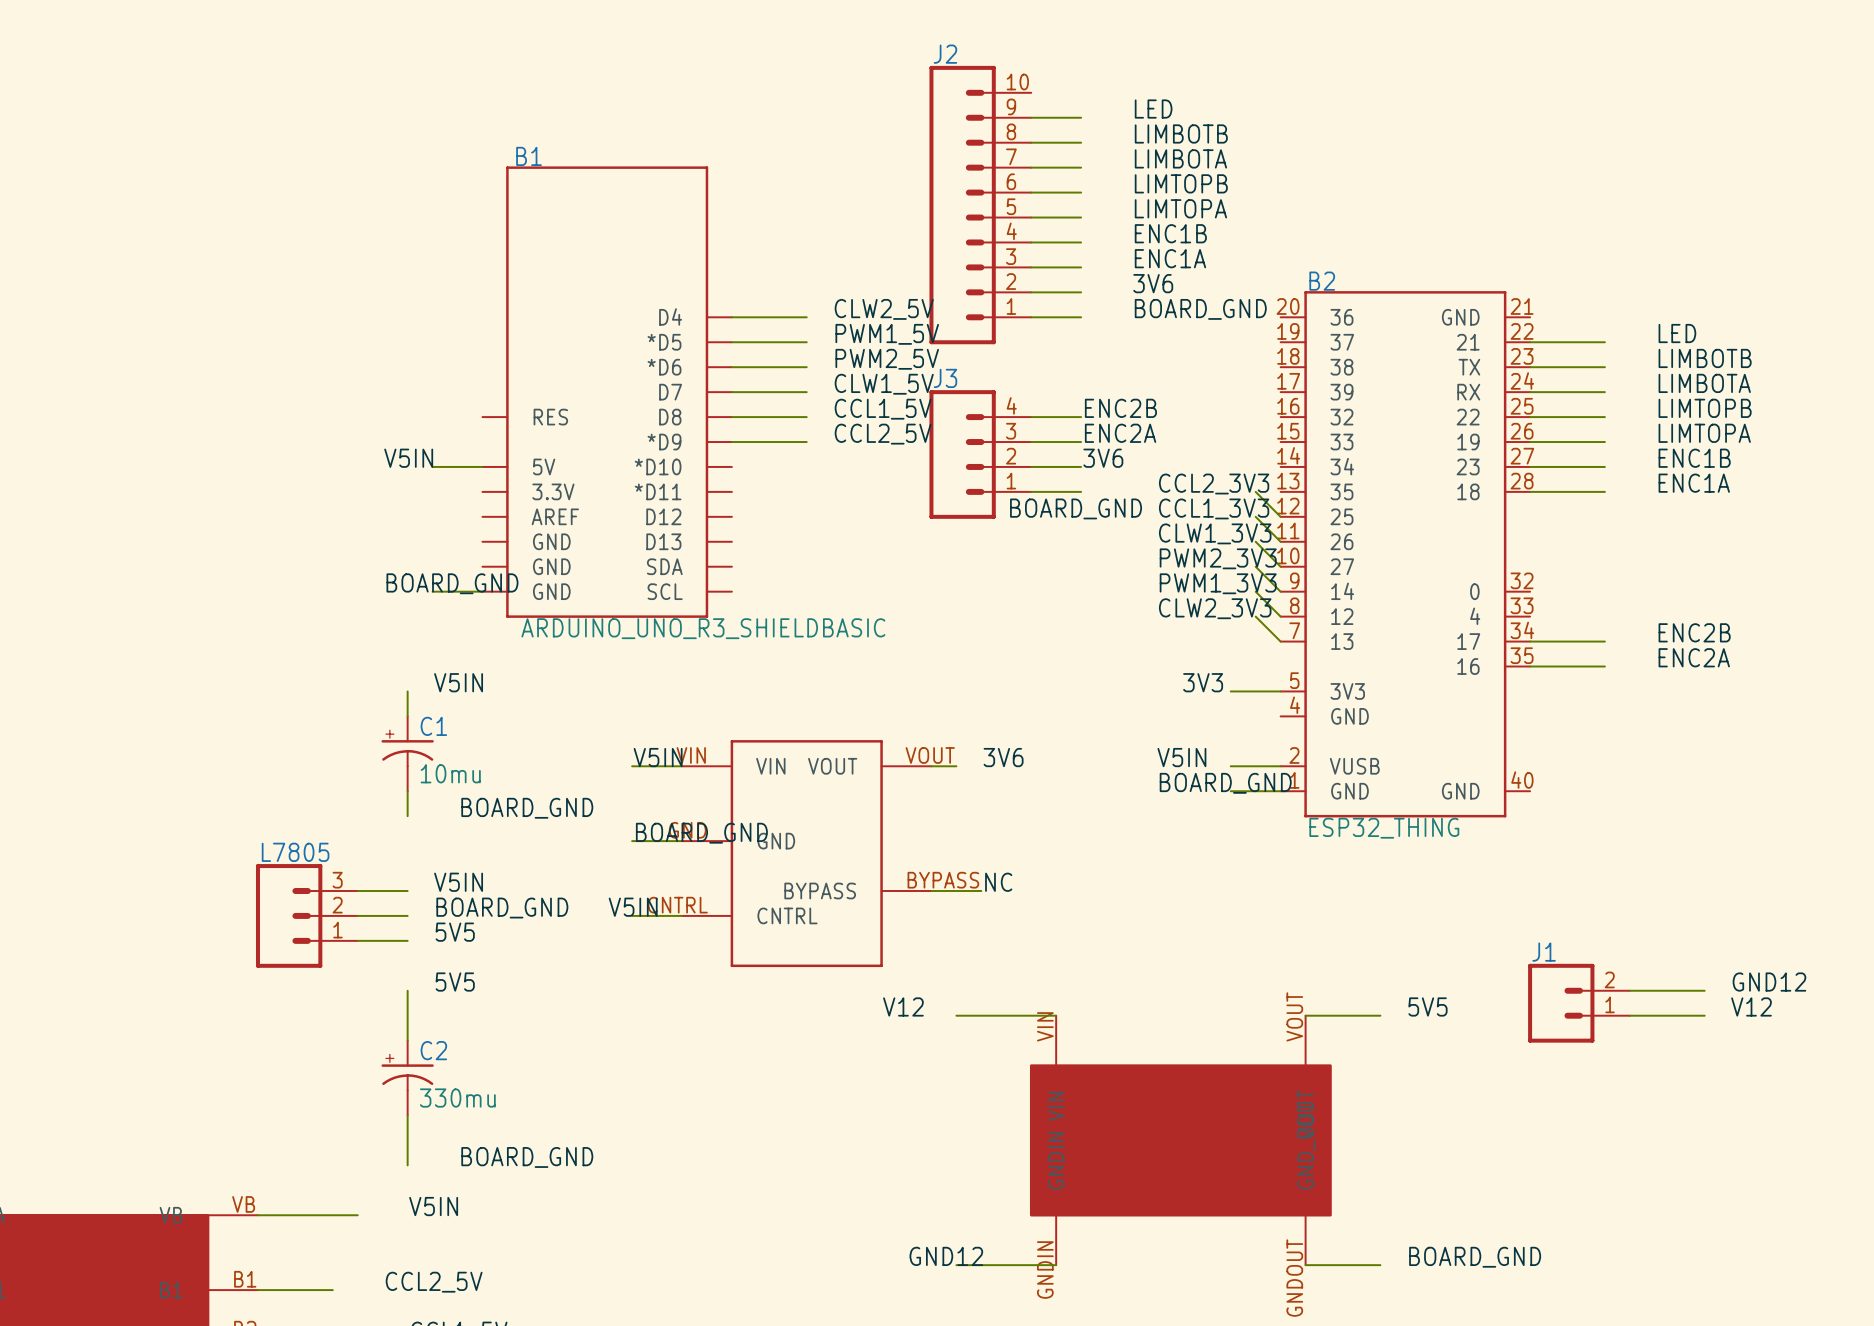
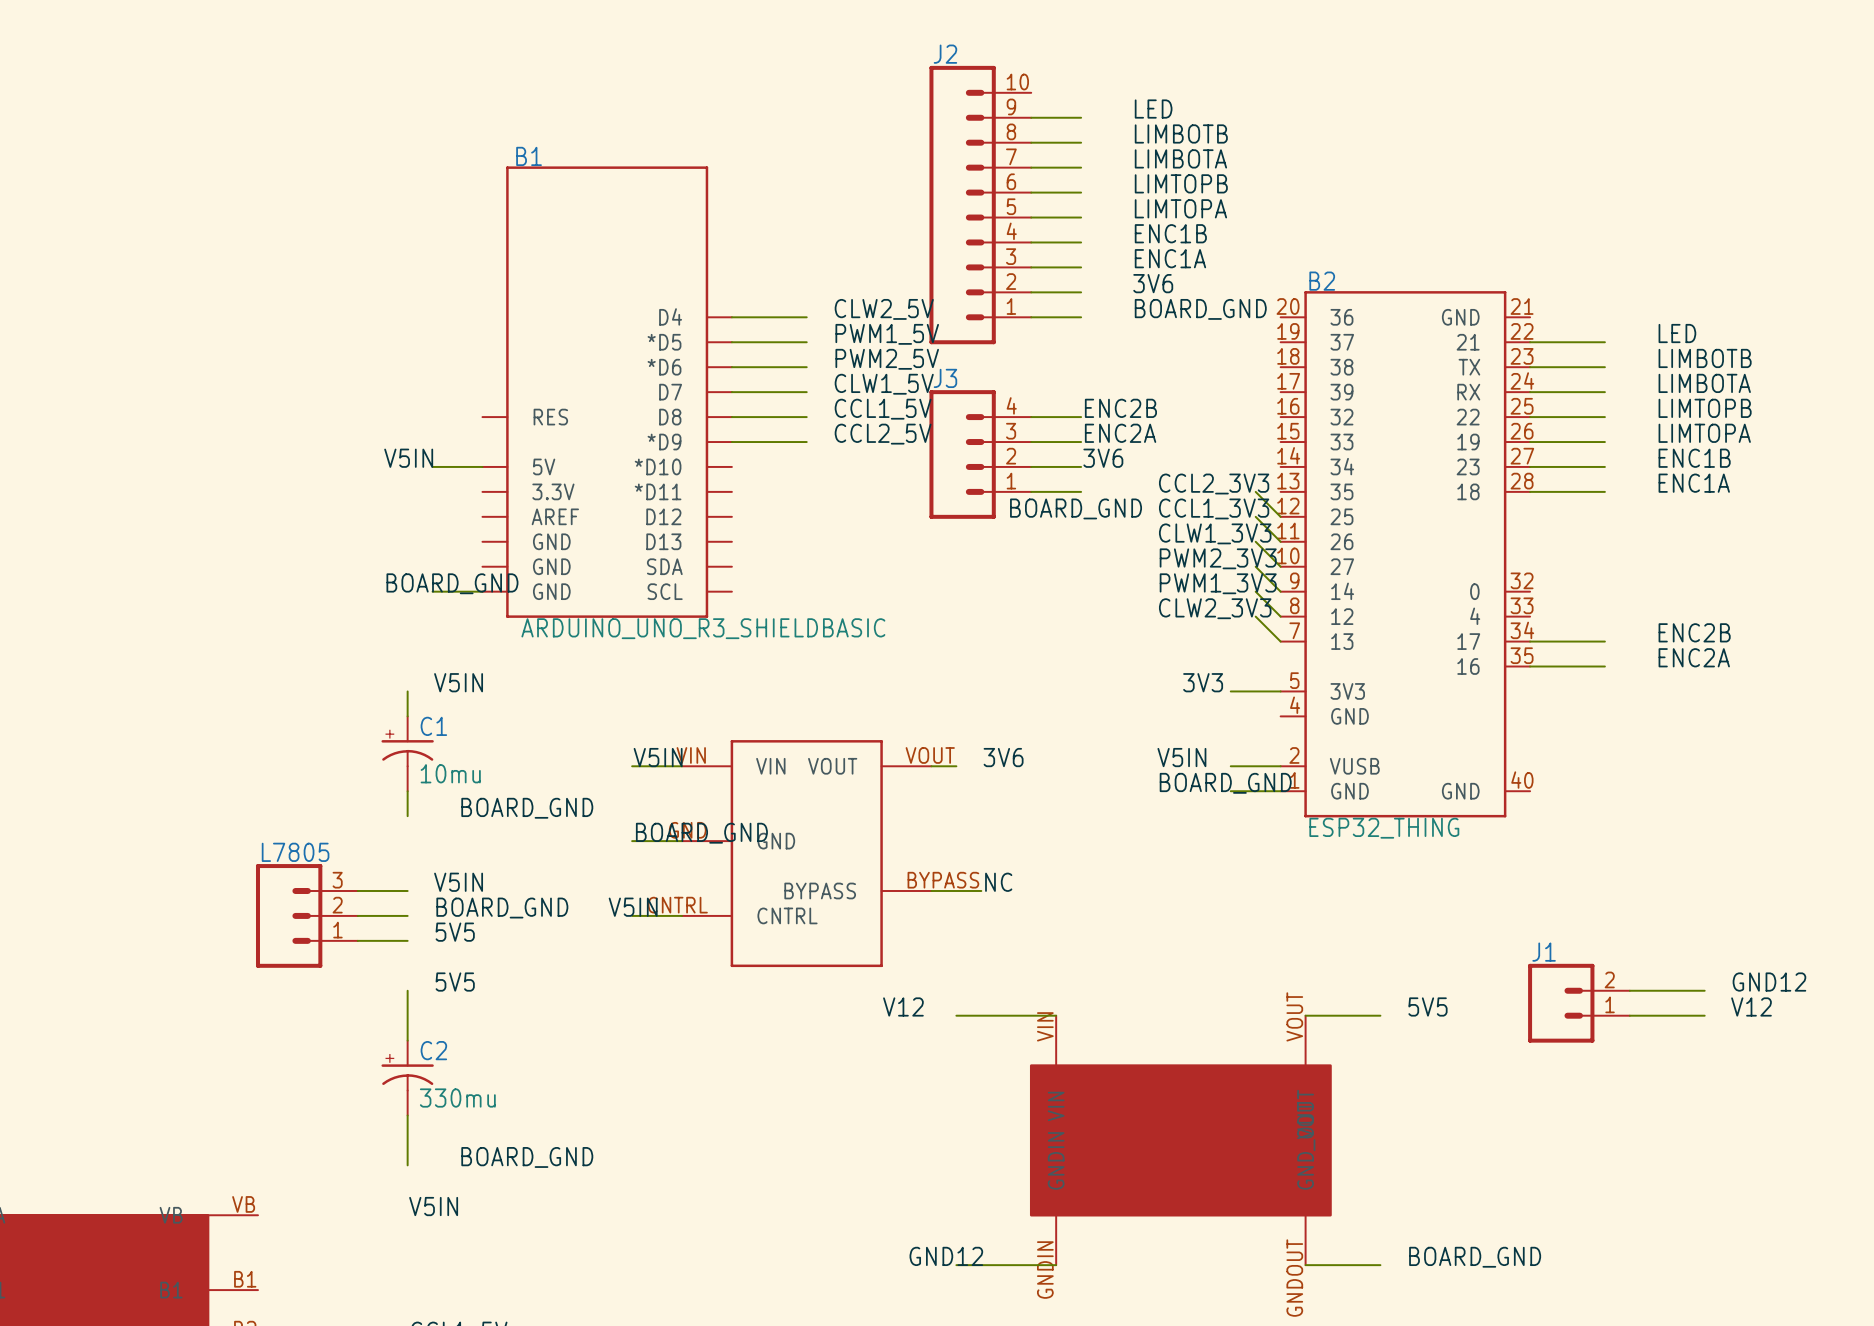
wire: (257, 1215) (357, 1215) -> none
label: CCL2_5V (434, 1282) -> none
wire: (257, 1290) (332, 1290) -> none

